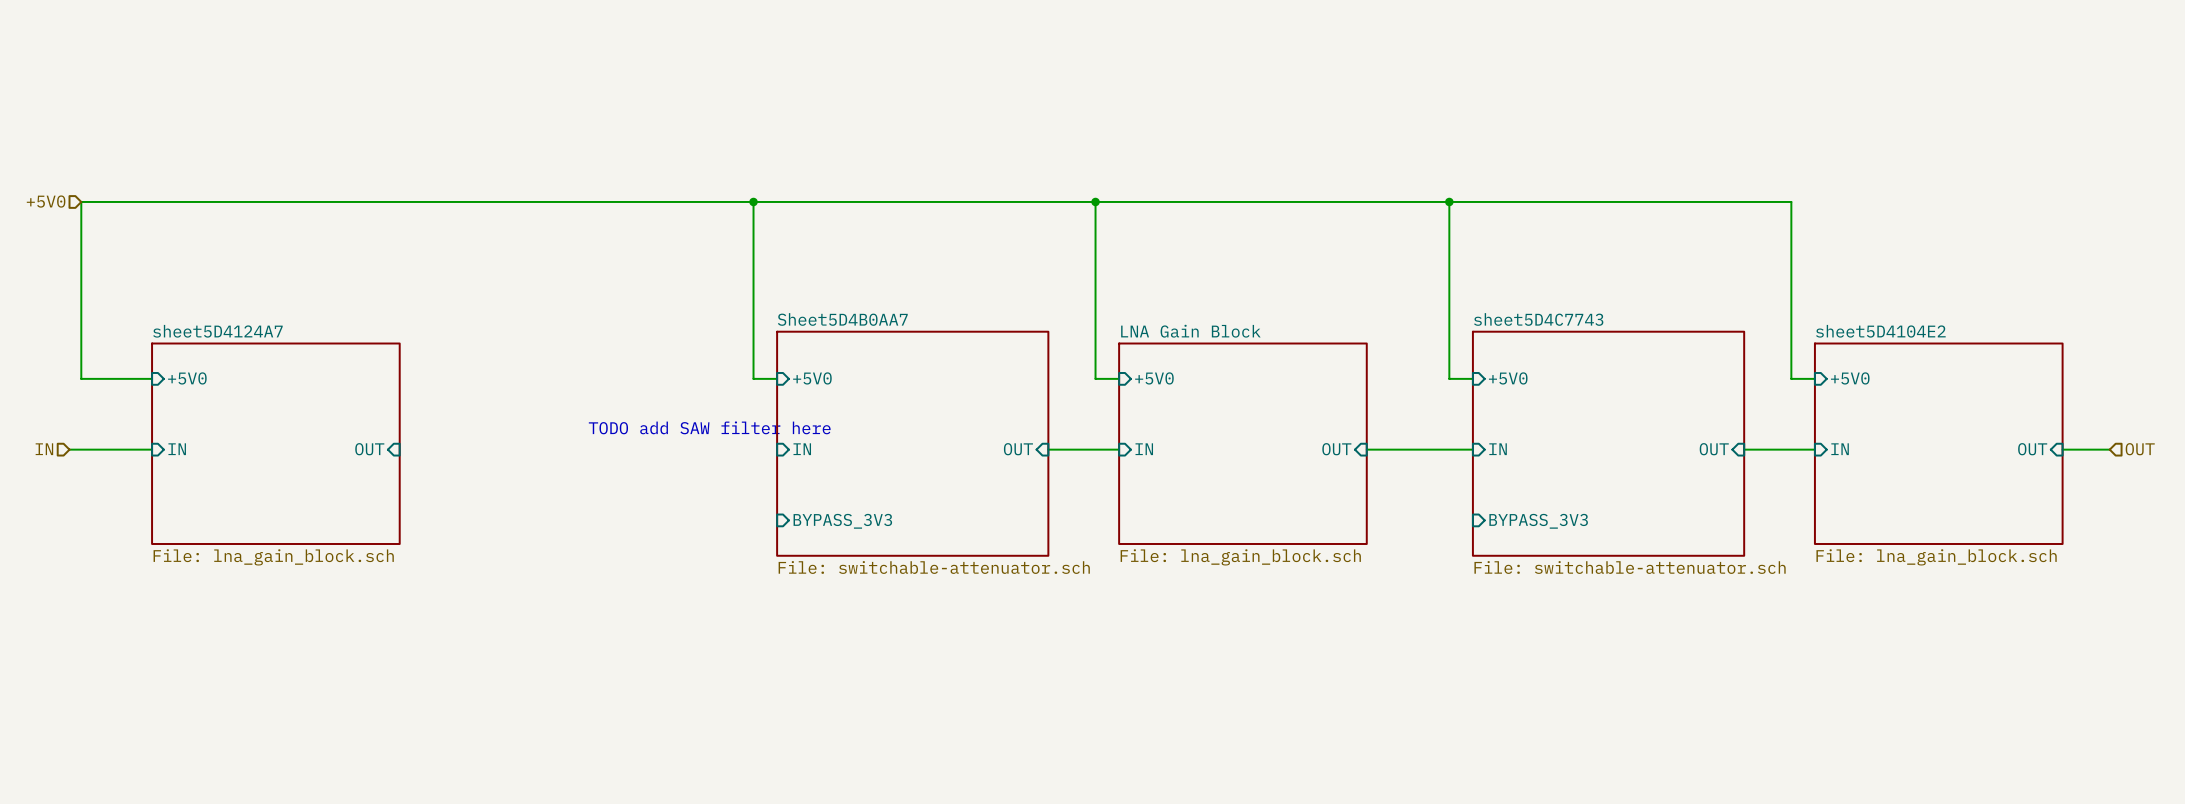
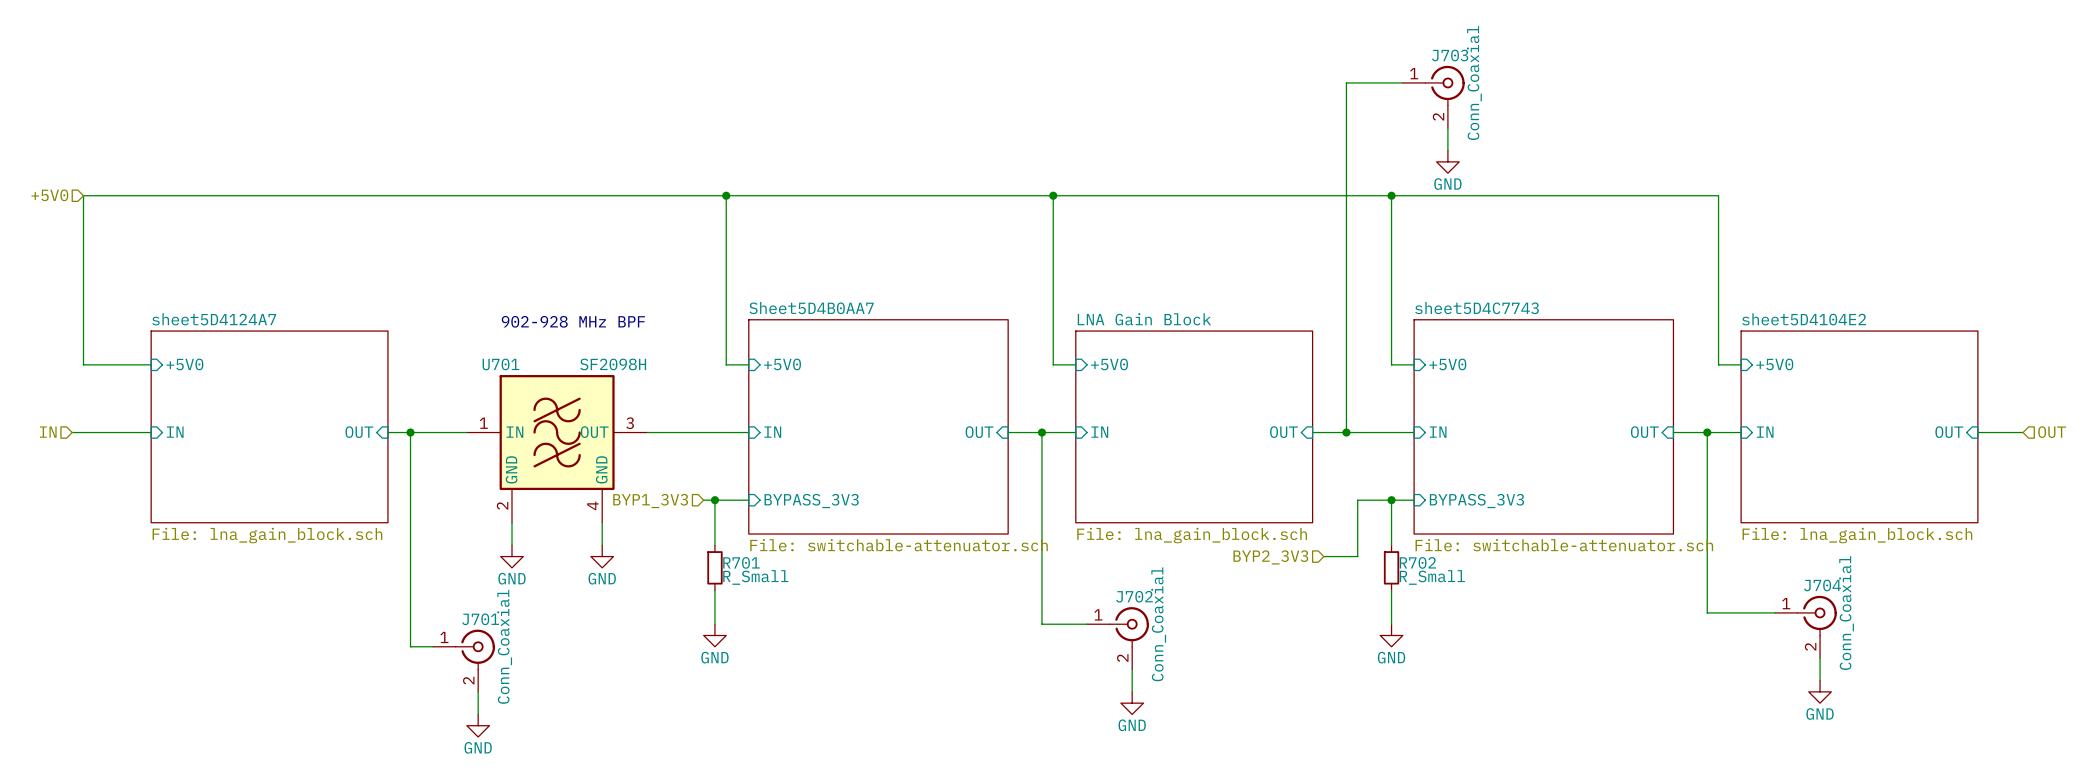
wire: none -> (1402, 82) (1346, 82) (1346, 432)
J703: none -> Conn_Coaxial (1433, 96)
wire: none -> (1447, 128) (1447, 150)
power symbol: none -> GND (1447, 161)
text: none -> 902-928 MHz BPF (573, 321)
text: TODO add SAW filter here (709, 427) -> none
wire: none -> (387, 432) (466, 432)
wire: none -> (410, 432) (410, 646) (433, 646)
junction: none -> (410, 432)
wire: none -> (647, 432) (748, 432)
wire: none -> (1041, 432) (1041, 624) (1087, 624)
junction: none -> (1041, 432)
junction: none -> (1346, 432)
wire: none -> (1707, 432) (1707, 612) (1774, 612)
junction: none -> (1707, 432)
U701: none -> SF2098H (557, 448)
wire: none -> (703, 500) (748, 500)
wire: none -> (714, 500) (714, 545)
junction: none -> (714, 500)
wire: none -> (1391, 500) (1391, 545)
junction: none -> (1391, 500)
wire: none -> (1414, 500) (1357, 500) (1357, 556) (1323, 556)
hierarchical label: none -> BYP1_3V3 (650, 501)
wire: none -> (512, 522) (512, 545)
wire: none -> (602, 522) (602, 545)
power symbol: none -> GND (512, 556)
power symbol: none -> GND (602, 556)
hierarchical label: none -> BYP2_3V3 (1270, 557)
R701: none -> R_Small (714, 567)
R702: none -> R_Small (1391, 567)
wire: none -> (714, 590) (714, 624)
wire: none -> (1391, 590) (1391, 624)
J704: none -> Conn_Coaxial (1805, 626)
power symbol: none -> GND (714, 635)
power symbol: none -> GND (1391, 635)
J702: none -> Conn_Coaxial (1118, 638)
wire: none -> (1820, 658) (1820, 680)
J701: none -> Conn_Coaxial (464, 660)
wire: none -> (1132, 669) (1132, 691)
wire: none -> (478, 691) (478, 714)
power symbol: none -> GND (1820, 691)
power symbol: none -> GND (1132, 703)
power symbol: none -> GND (478, 725)

